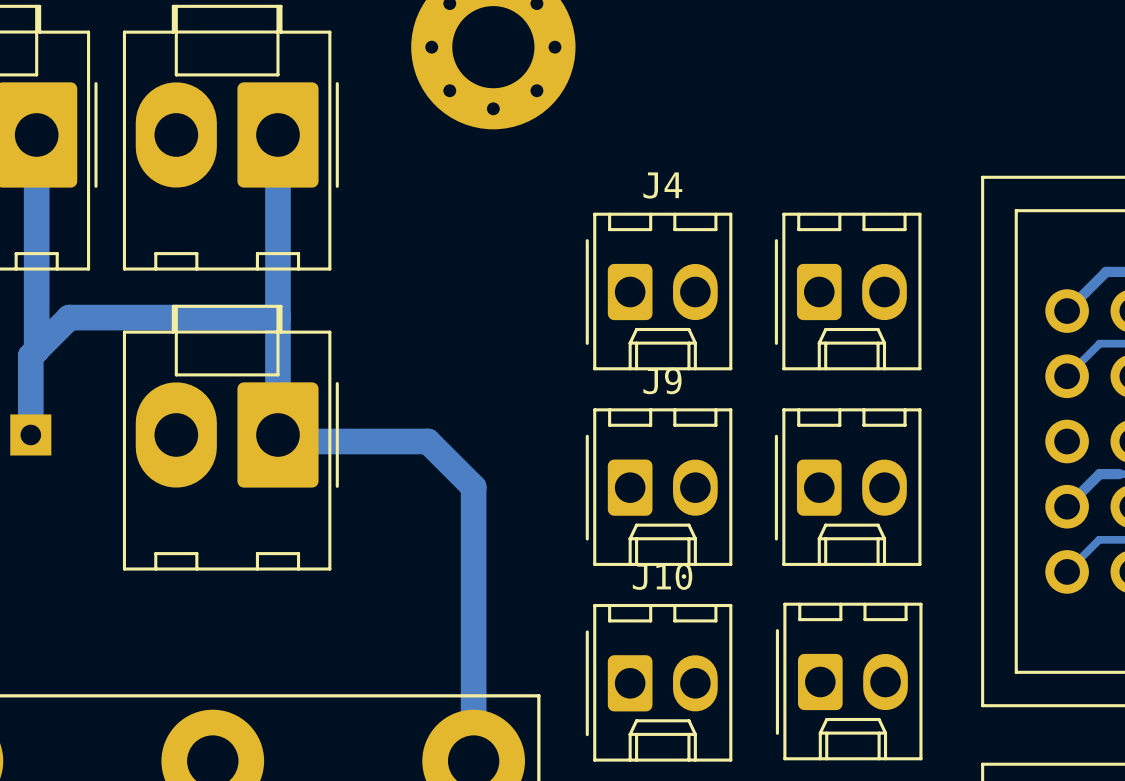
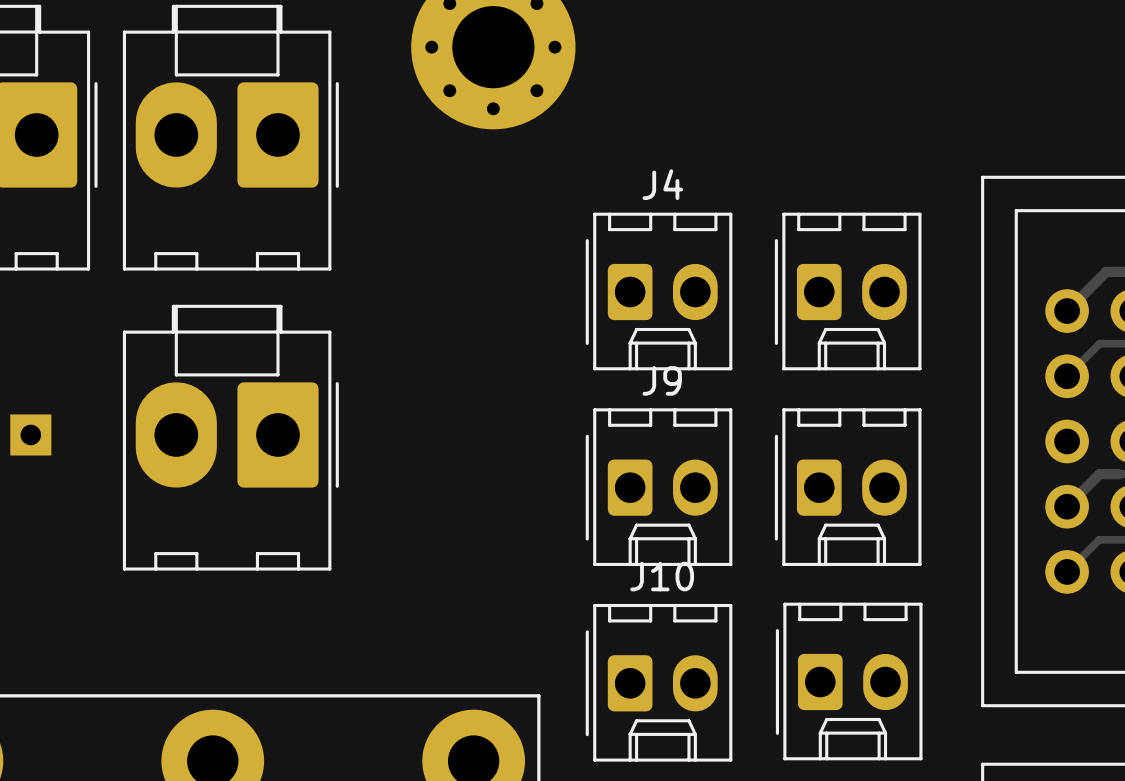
track: (36, 134) (36, 350) -> none
track: (277, 134) (277, 434) (284, 441) (427, 441) (473, 487) (473, 761) -> none
track: (277, 317) (69, 317) (30, 356) (30, 434) -> none

